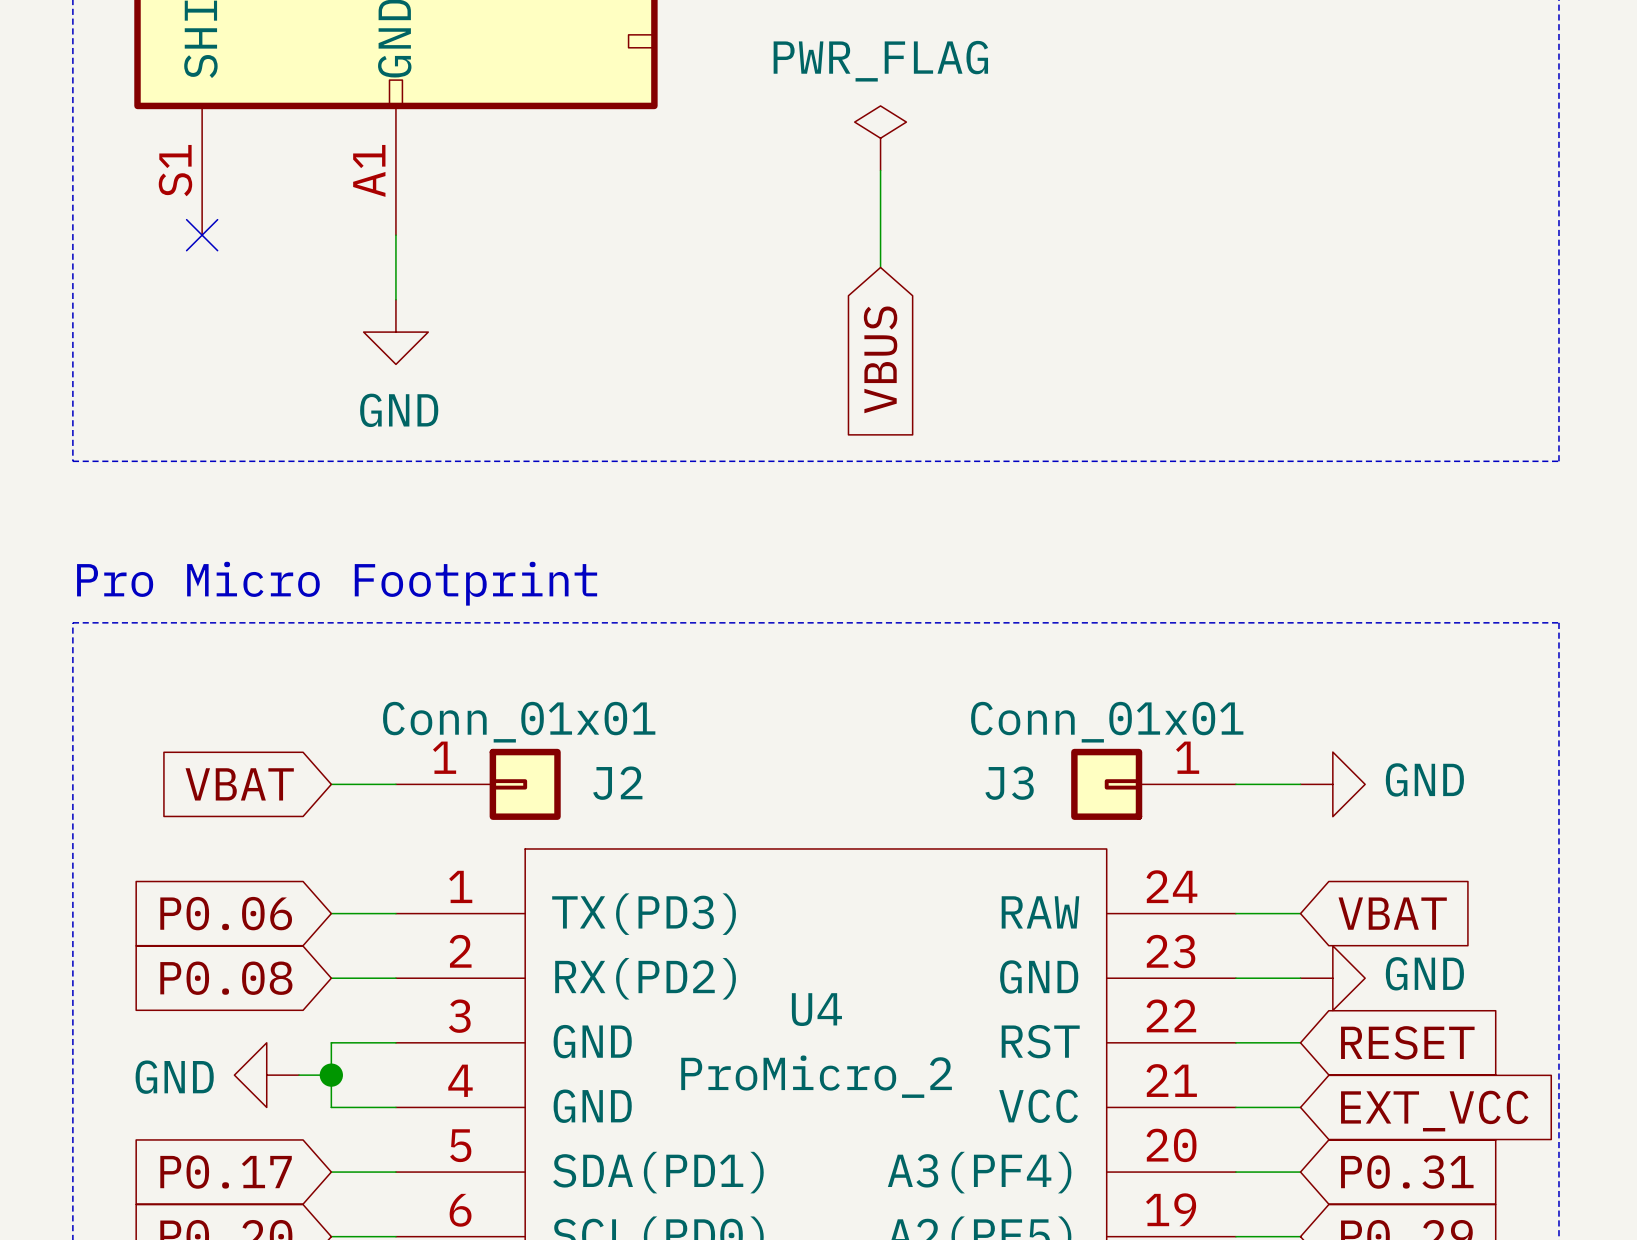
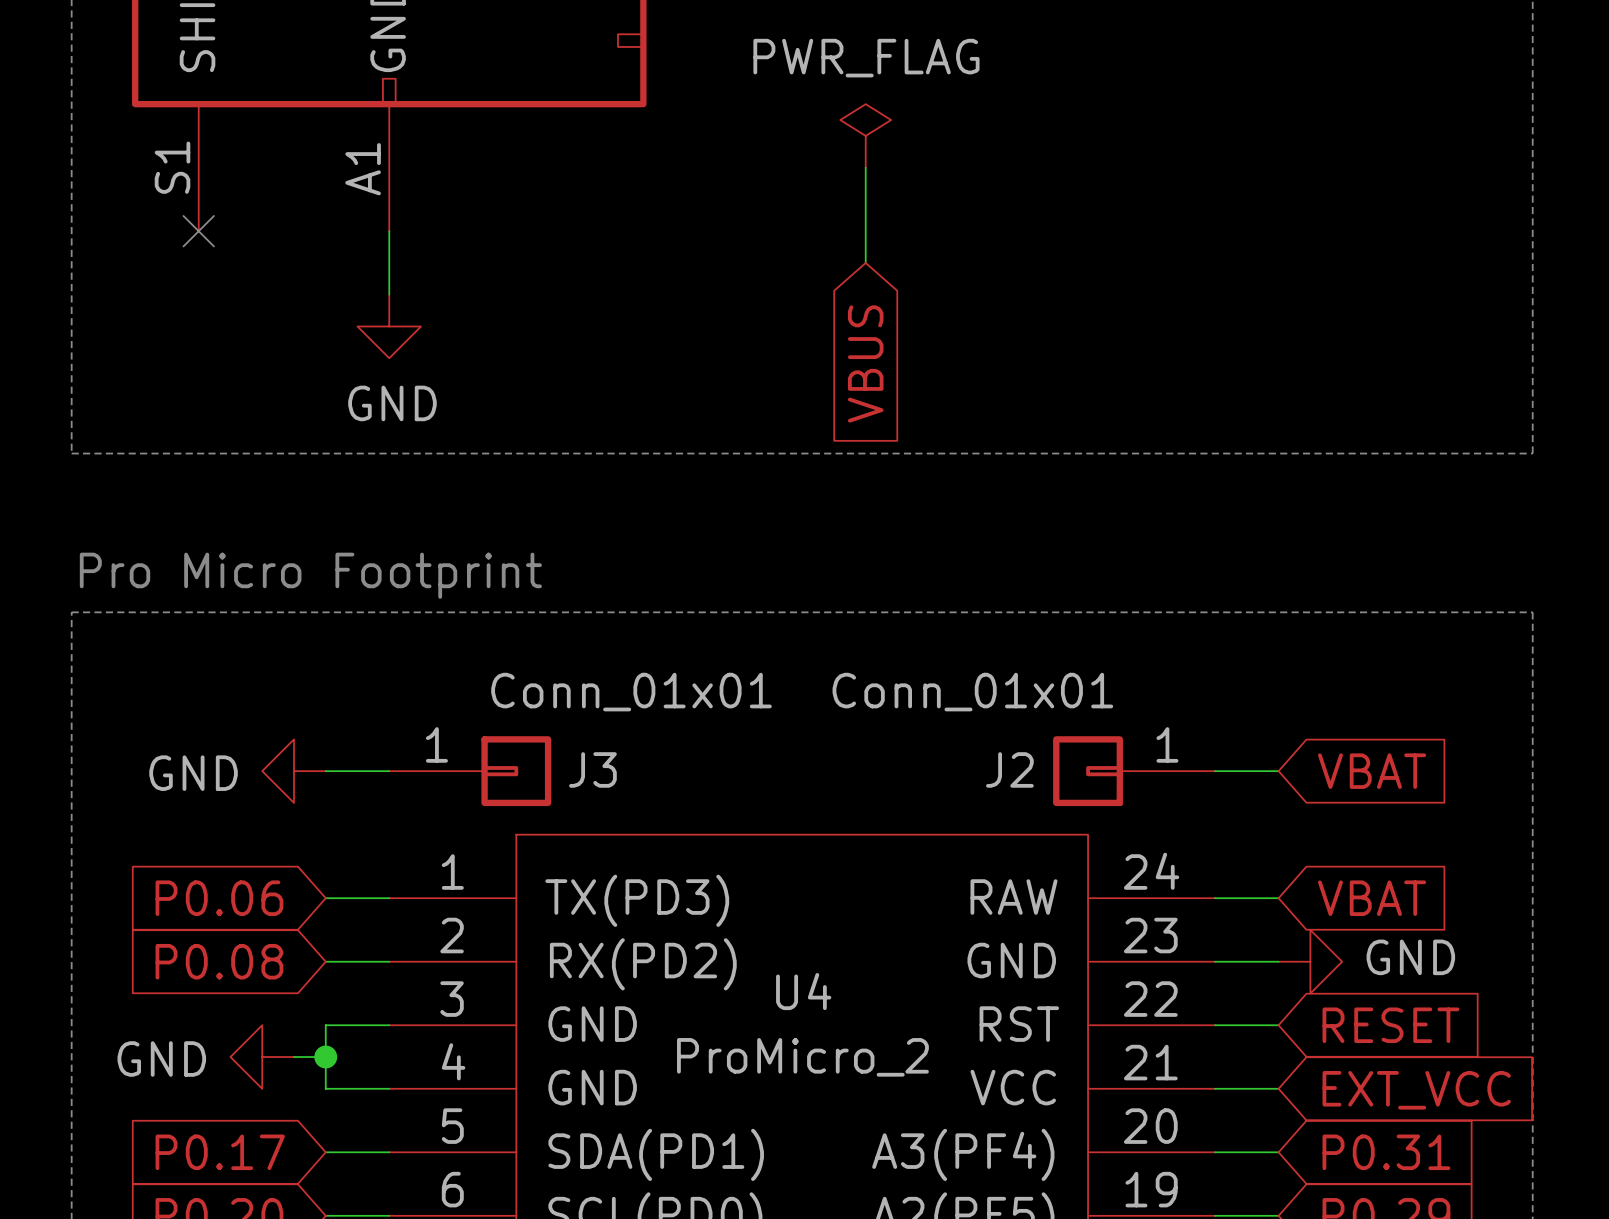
J2 value position: Conn_01x01 (519, 722) -> Conn_01x01 (631, 692)
J3 value position: Conn_01x01 (1107, 722) -> Conn_01x01 (972, 692)
J2 name: J2 (617, 783) -> J3 (592, 769)
J3 name: J3 (1009, 783) -> J2 (1009, 769)
global label: VBAT (239, 784) -> none
power symbol: none -> GND (294, 771)
power symbol: GND (1332, 784) -> none
global label: none -> VBAT (1372, 771)

